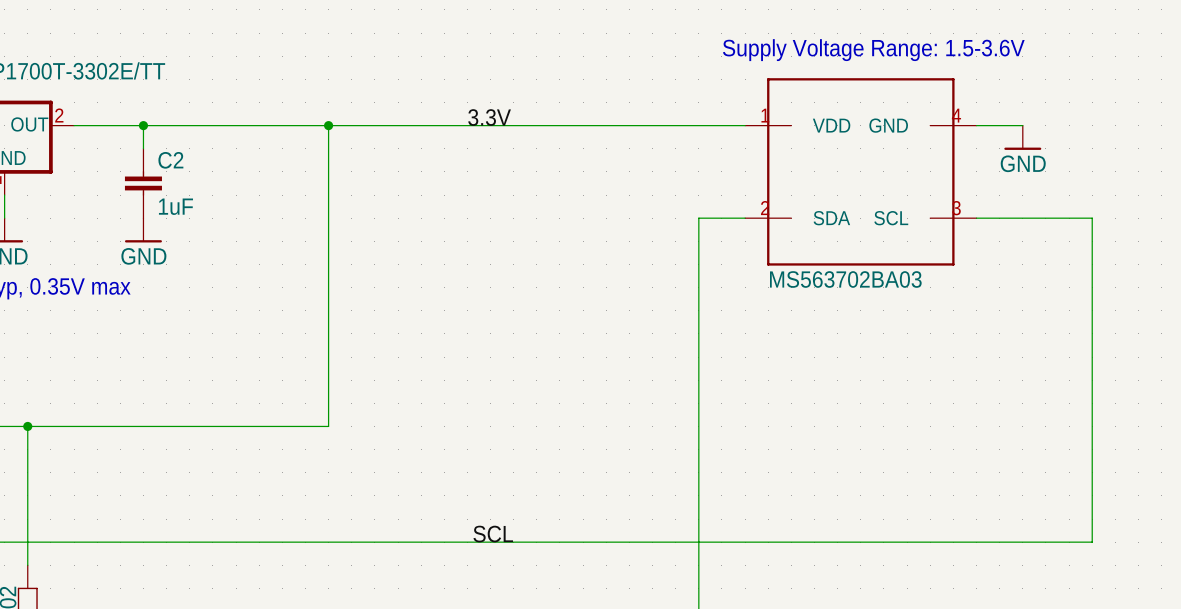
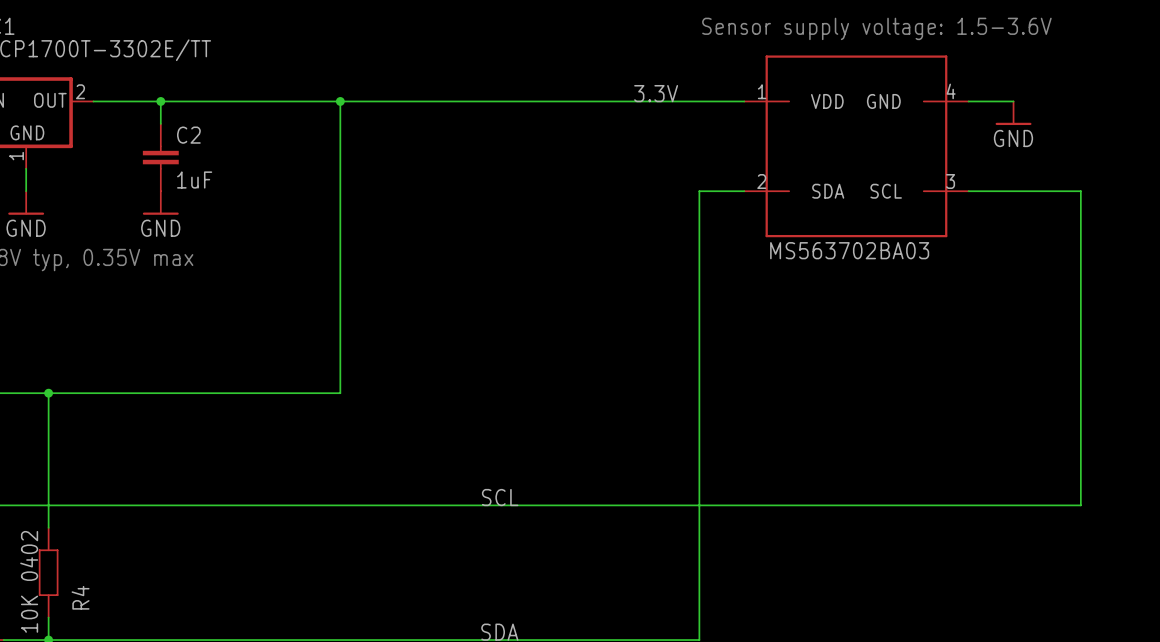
text: Supply Voltage Range: 1.5-3.6V (873, 50) -> Sensor supply voltage: 1.5-3.6V (876, 28)
label position: 3.3V (489, 117) -> 3.3V (656, 93)

